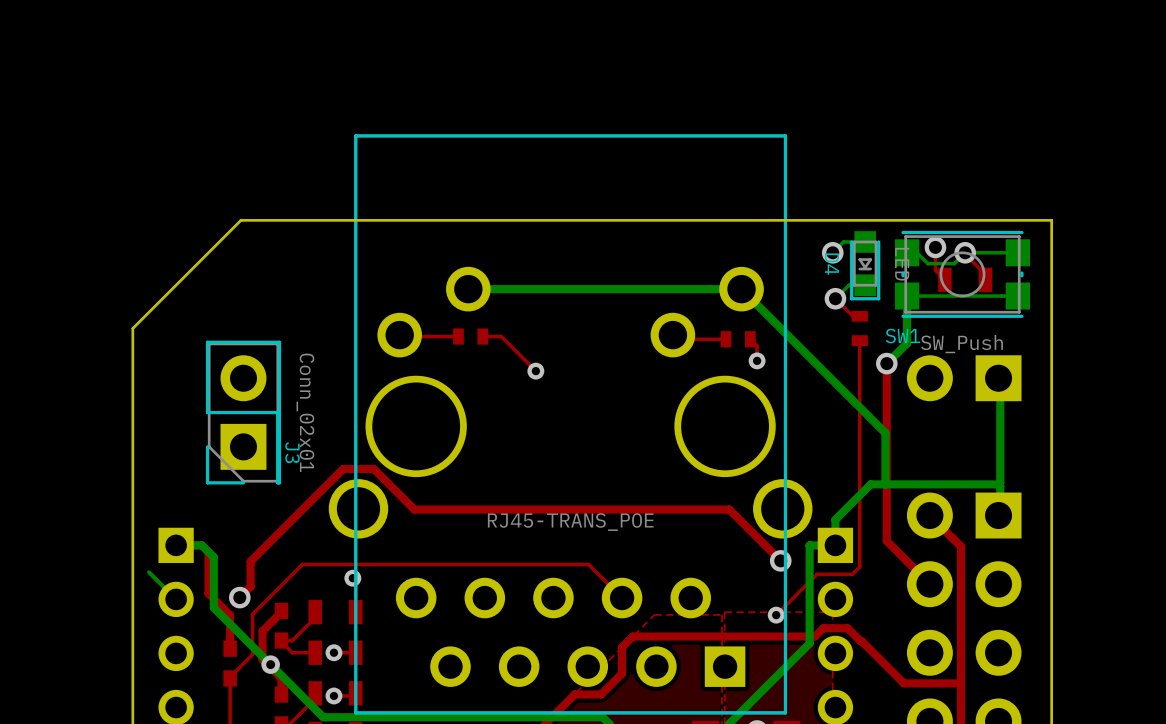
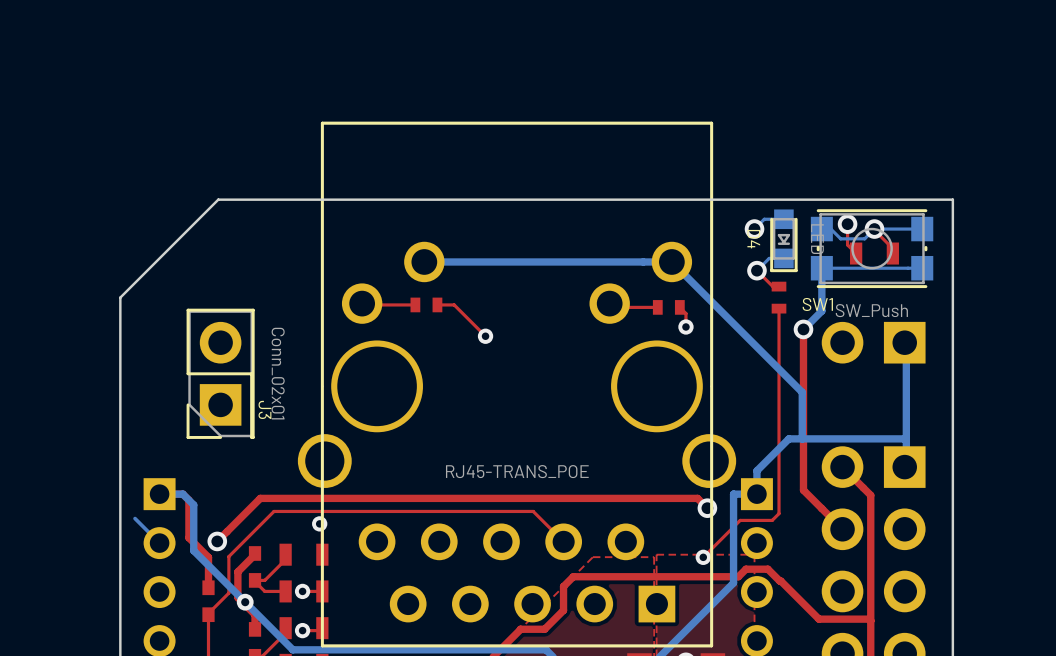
top track: (769, 550) (729, 509) (414, 509) (373, 468) (343, 468) (250, 561) (250, 586) -> (697, 498) (260, 498) (227, 531)

